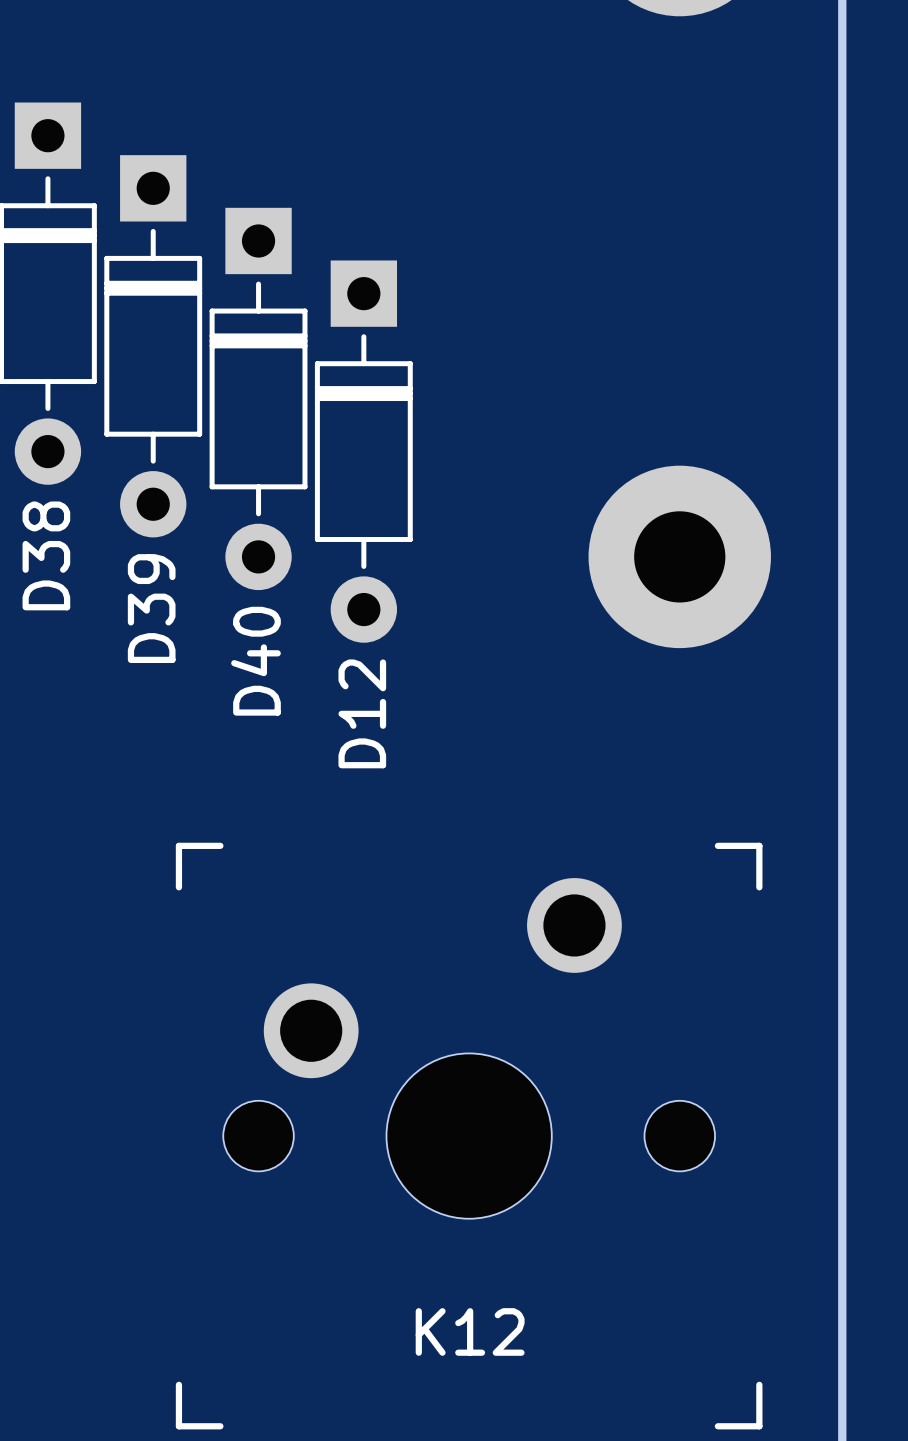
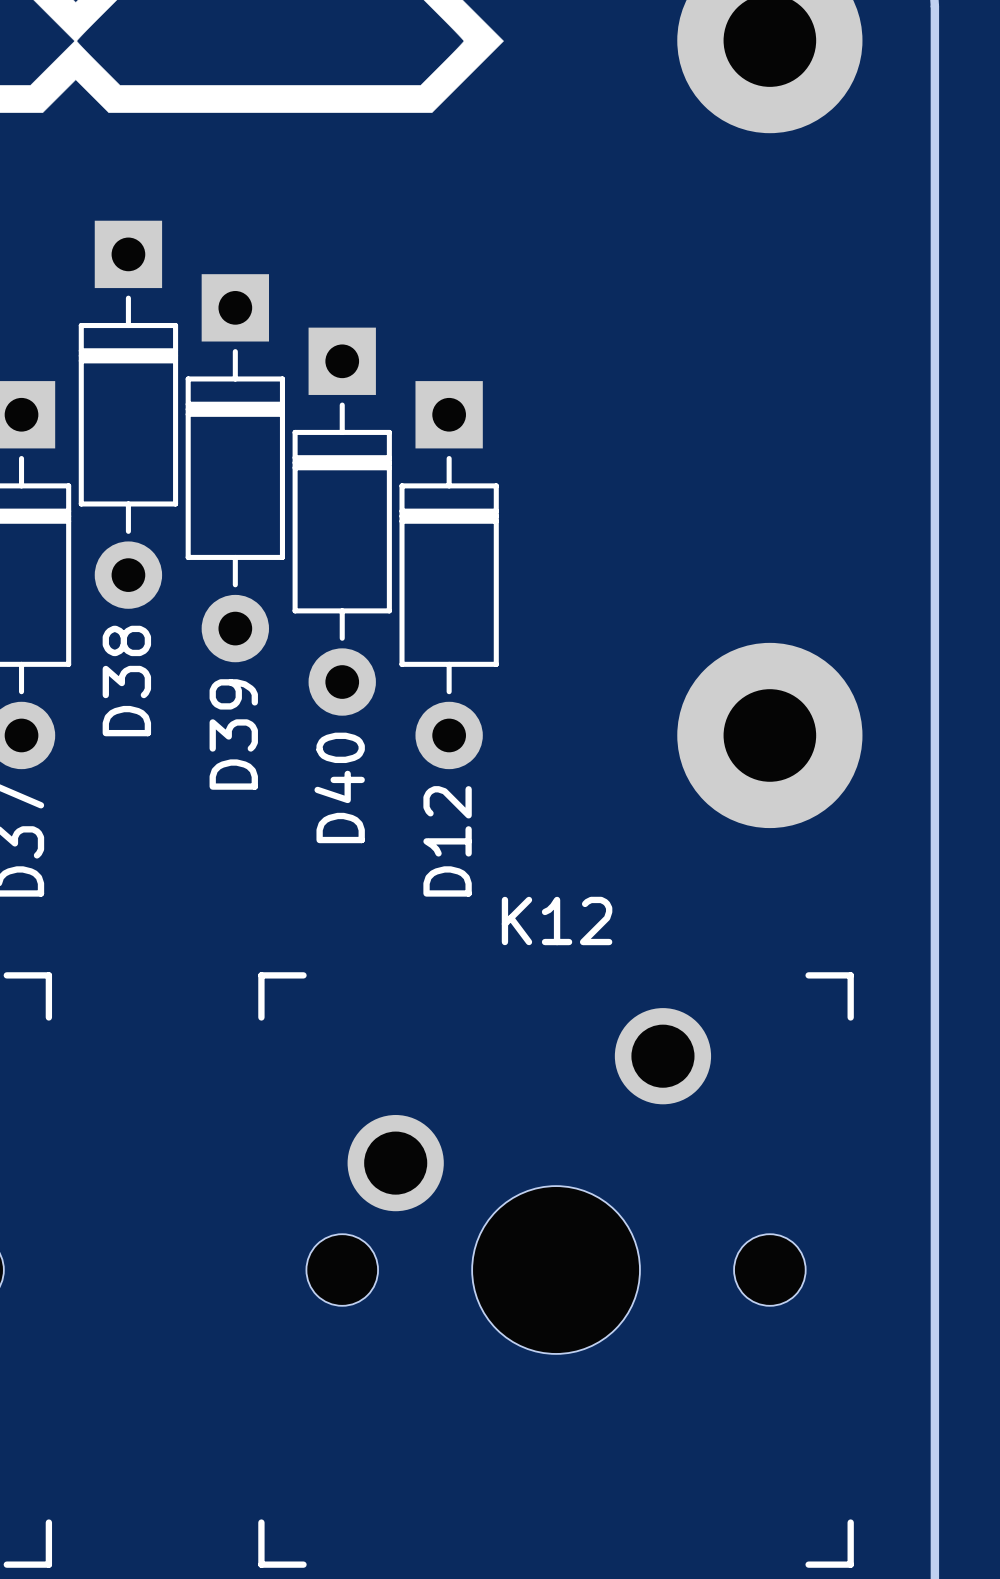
part position: (679, 556) -> (769, 735)
K12 name position: K12 (470, 1331) -> K12 (557, 920)

